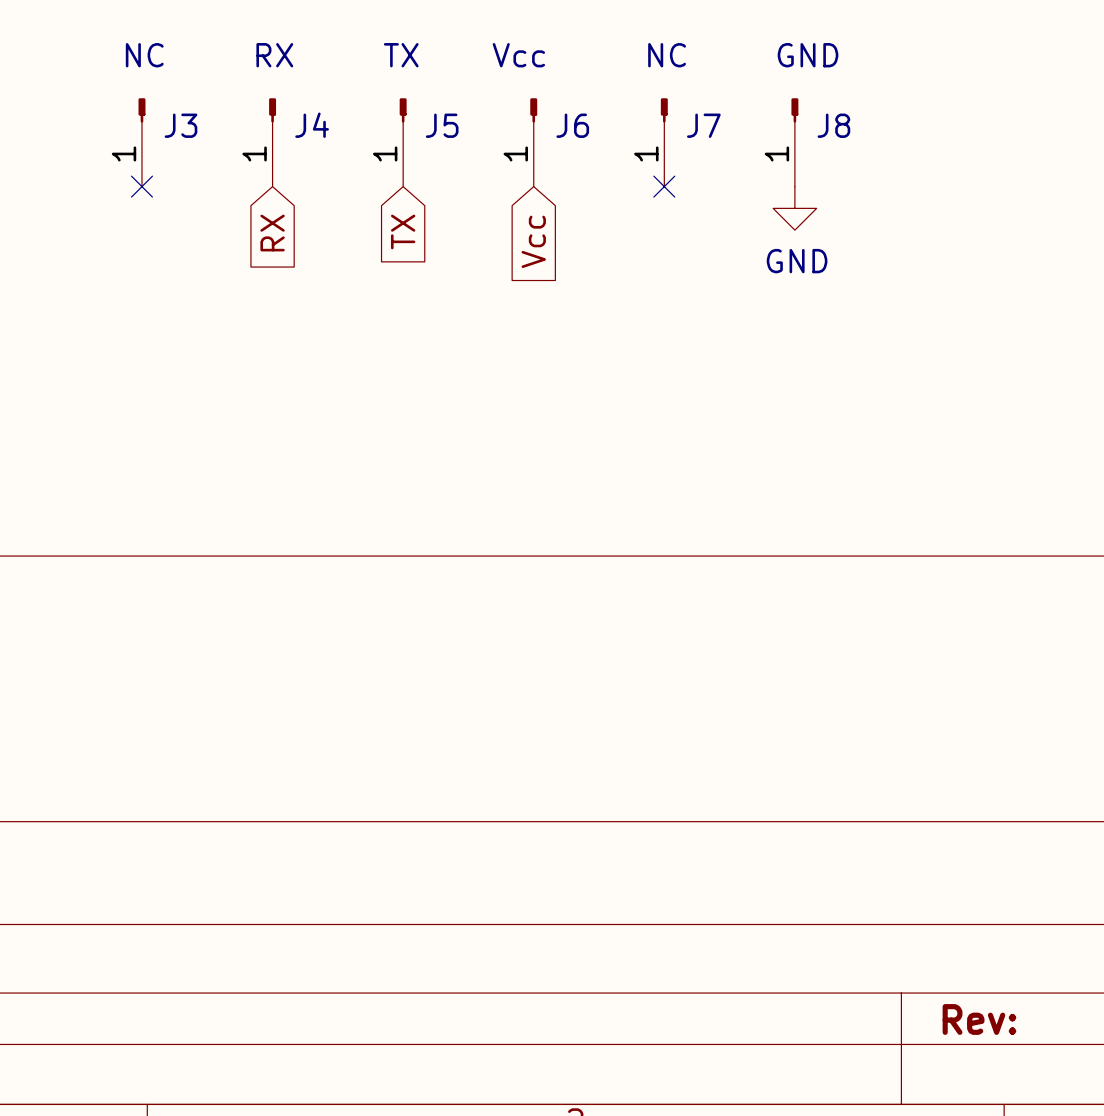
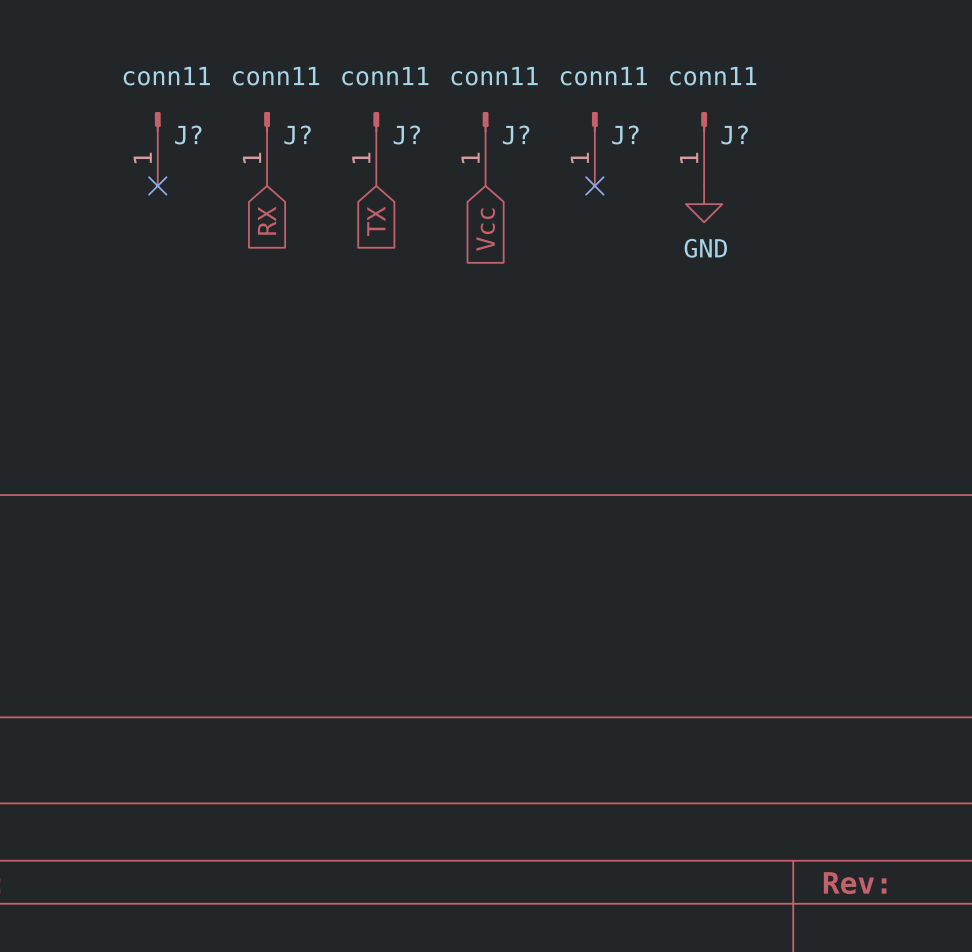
J3 value: NC (144, 55) -> conn11 (166, 76)
J4 value: RX (274, 55) -> conn11 (276, 76)
J5 value: TX (401, 55) -> conn11 (385, 76)
J6 value: Vcc (518, 55) -> conn11 (494, 76)
J7 value: NC (667, 55) -> conn11 (603, 76)
J8 value: GND (808, 55) -> conn11 (713, 76)
J3 name: J3 (180, 125) -> J? (188, 135)
J4 name: J4 (312, 125) -> J? (297, 135)
J5 name: J5 (442, 125) -> J? (406, 135)
J6 name: J6 (572, 125) -> J? (516, 135)
J7 name: J7 (703, 125) -> J? (625, 135)
J8 name: J8 (833, 125) -> J? (734, 135)

